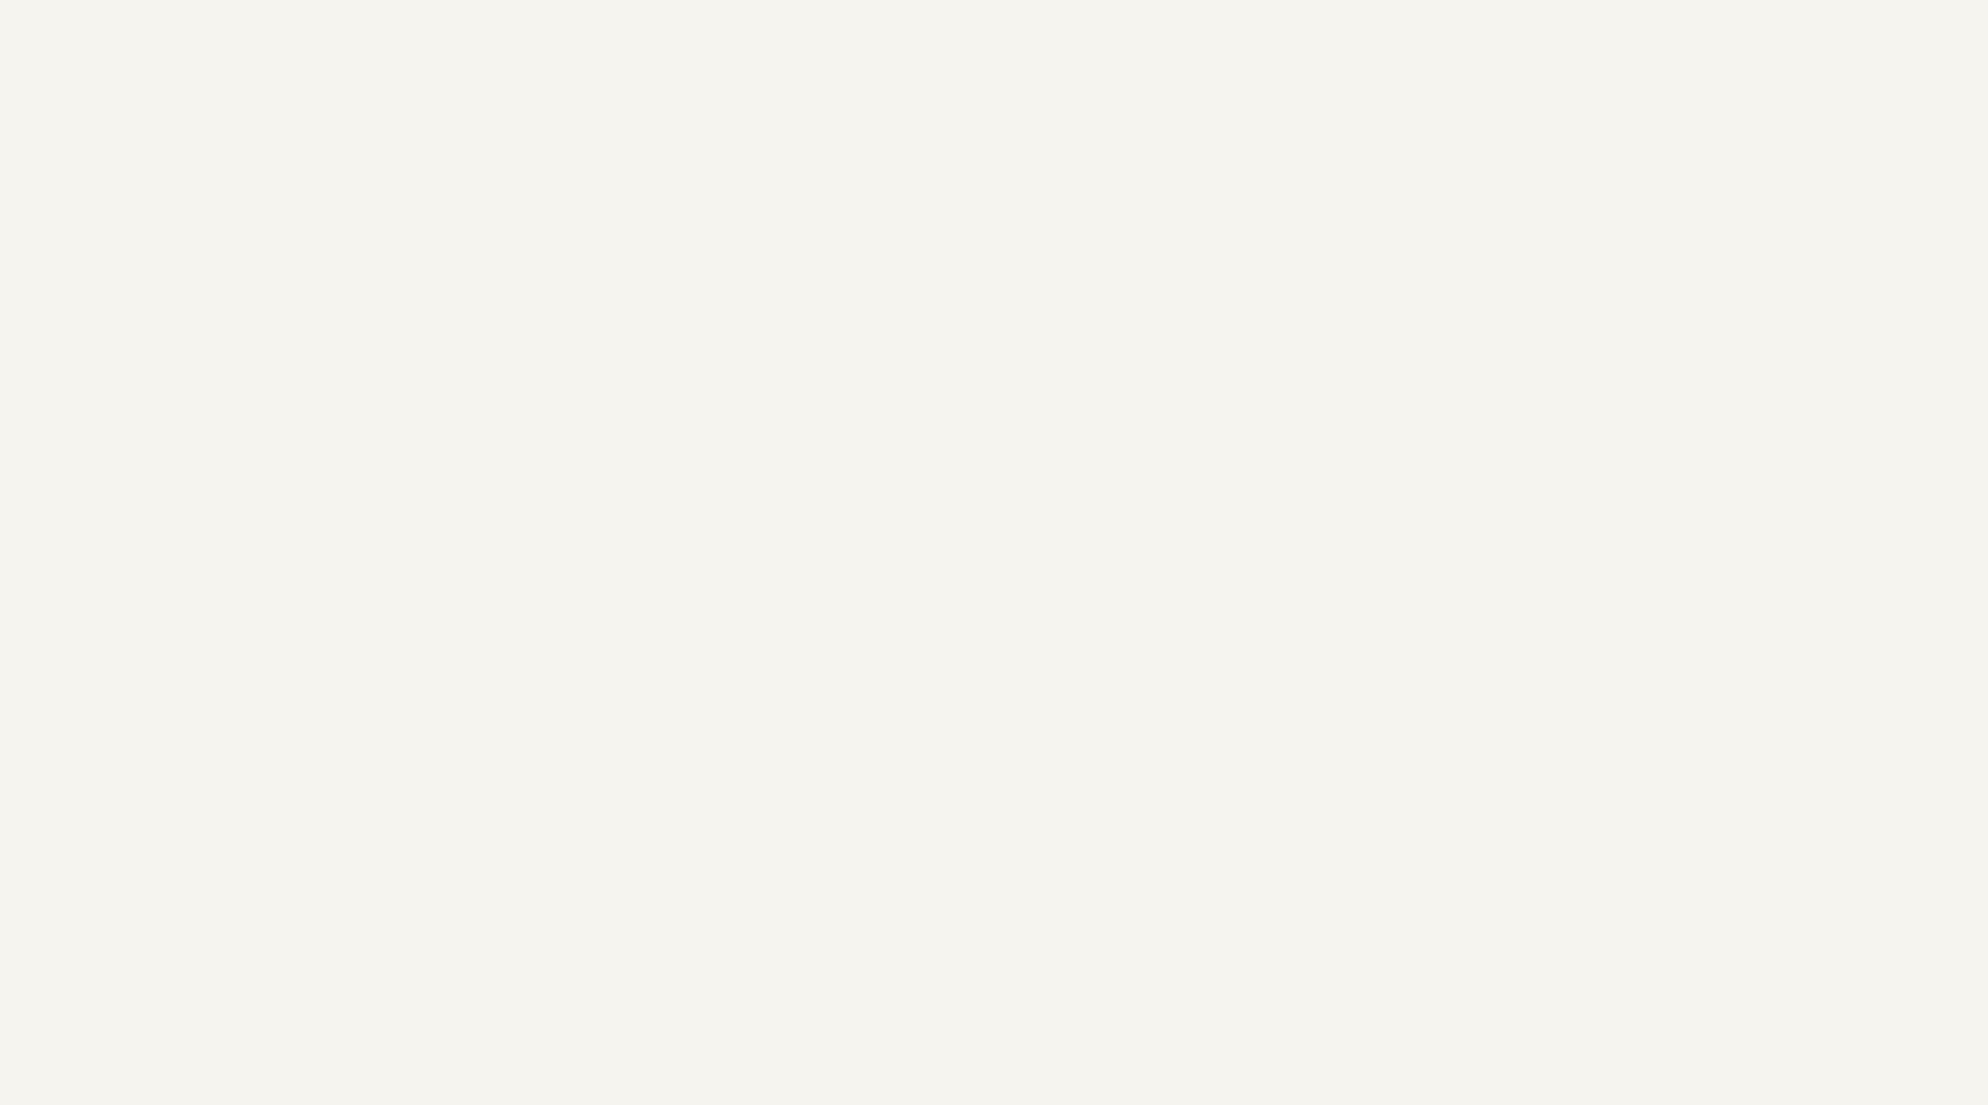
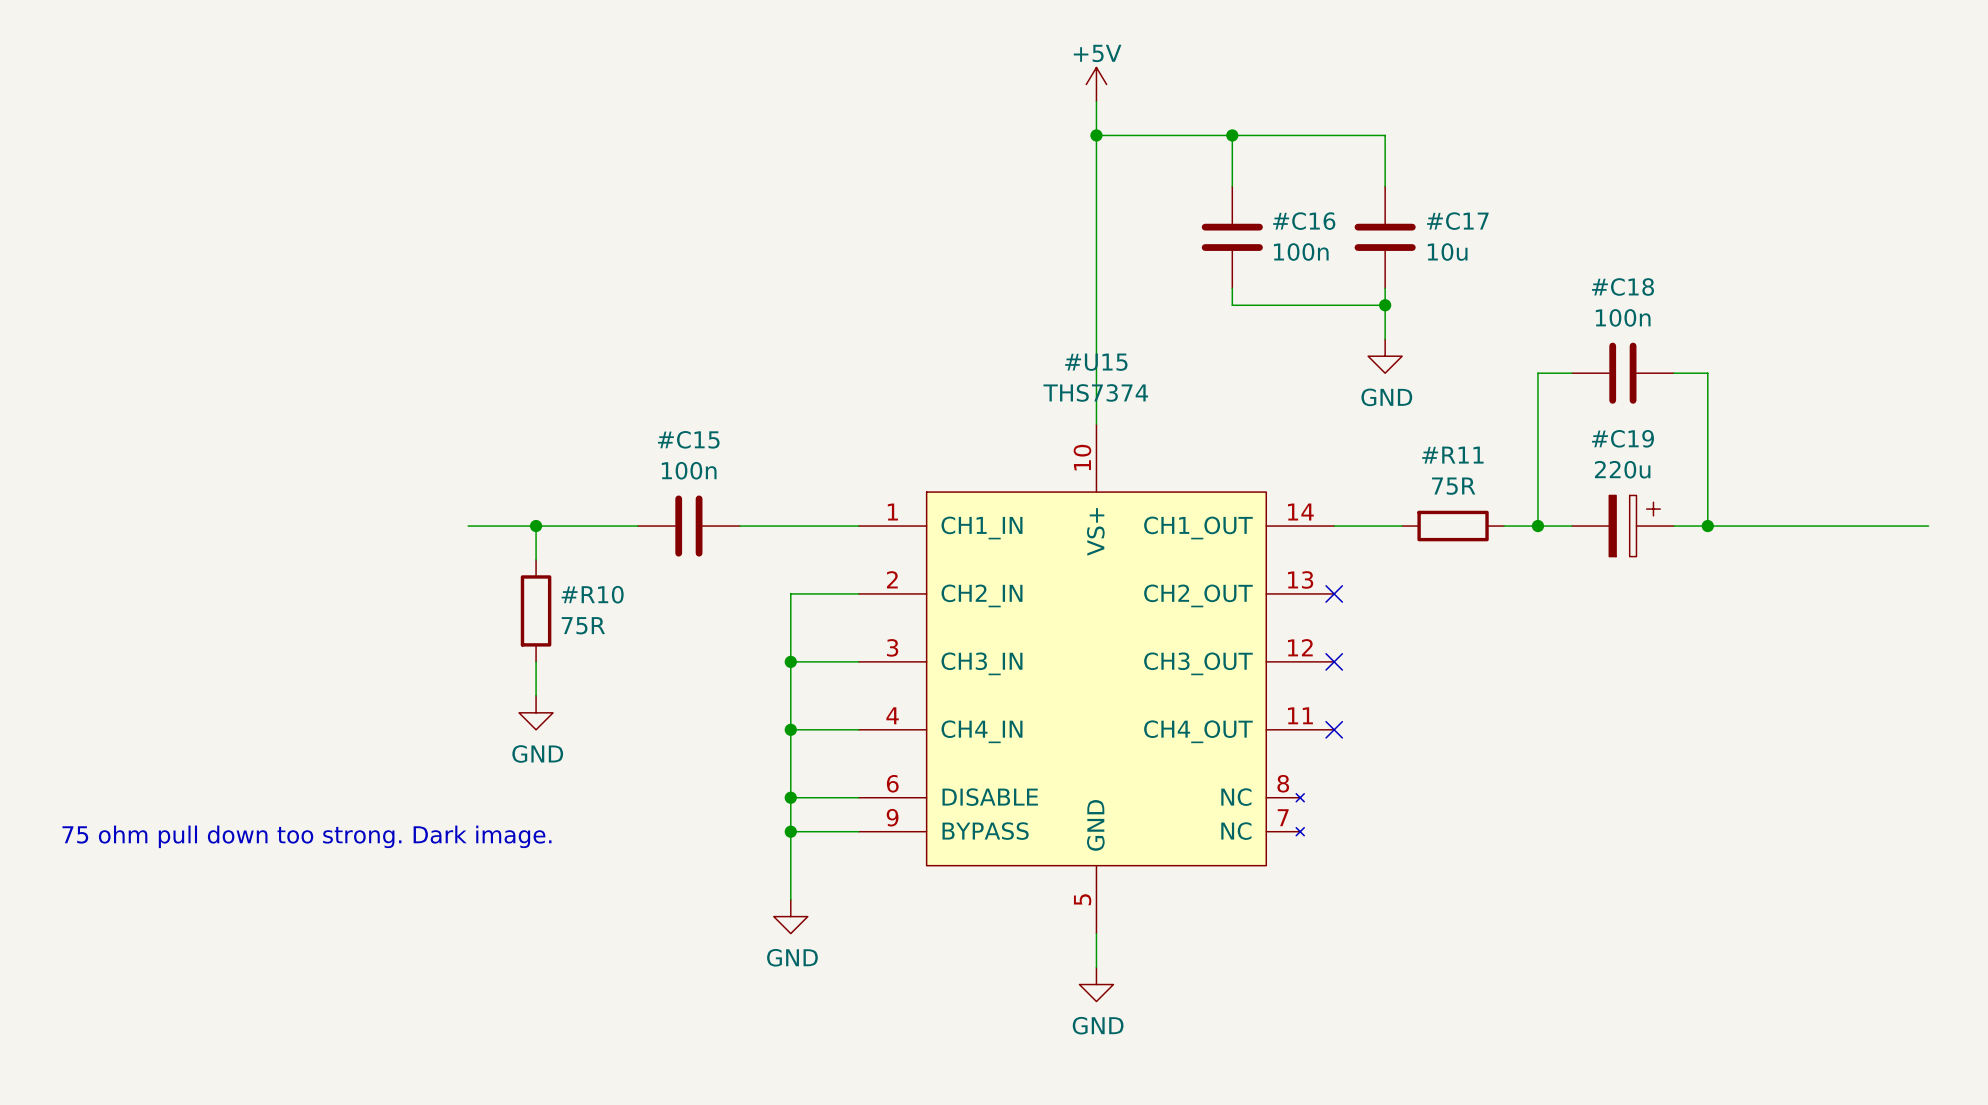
power symbol: none -> +5V (1096, 84)
wire: none -> (1096, 101) (1096, 424)
wire: none -> (1096, 135) (1385, 135) (1385, 186)
junction: none -> (1096, 135)
wire: none -> (1232, 135) (1232, 186)
junction: none -> (1232, 135)
#C16: none -> 100n (1232, 237)
#C17: none -> 10u (1385, 237)
wire: none -> (1232, 288) (1232, 305) (1385, 305)
wire: none -> (1385, 288) (1385, 339)
junction: none -> (1385, 305)
power symbol: none -> GND (1385, 356)
wire: none -> (1571, 373) (1537, 373) (1537, 526)
#C18: none -> 100n (1622, 373)
wire: none -> (1673, 373) (1707, 373) (1707, 526)
wire: none -> (468, 526) (637, 526)
wire: none -> (536, 526) (536, 559)
junction: none -> (536, 526)
#C15: none -> 100n (688, 526)
wire: none -> (739, 526) (858, 526)
wire: none -> (1334, 526) (1402, 526)
#R11: none -> 75R (1453, 526)
wire: none -> (1504, 526) (1571, 526)
junction: none -> (1537, 526)
#C19: none -> 220u (1622, 526)
wire: none -> (1673, 526) (1928, 526)
junction: none -> (1707, 526)
wire: none -> (858, 593) (790, 593) (790, 899)
no-connect mark: none -> (1334, 593)
#R10: none -> 75R (536, 610)
wire: none -> (536, 661) (536, 695)
wire: none -> (790, 661) (858, 661)
junction: none -> (790, 661)
no-connect mark: none -> (1334, 661)
#U15: none -> THS7374 (1096, 678)
power symbol: none -> GND (536, 712)
wire: none -> (790, 729) (858, 729)
junction: none -> (790, 729)
no-connect mark: none -> (1334, 729)
wire: none -> (790, 797) (858, 797)
junction: none -> (790, 797)
wire: none -> (790, 831) (858, 831)
junction: none -> (790, 831)
text: none -> 75 ohm pull down too strong. Dark image. (306, 836)
power symbol: none -> GND (790, 916)
wire: none -> (1096, 933) (1096, 967)
power symbol: none -> GND (1096, 984)

